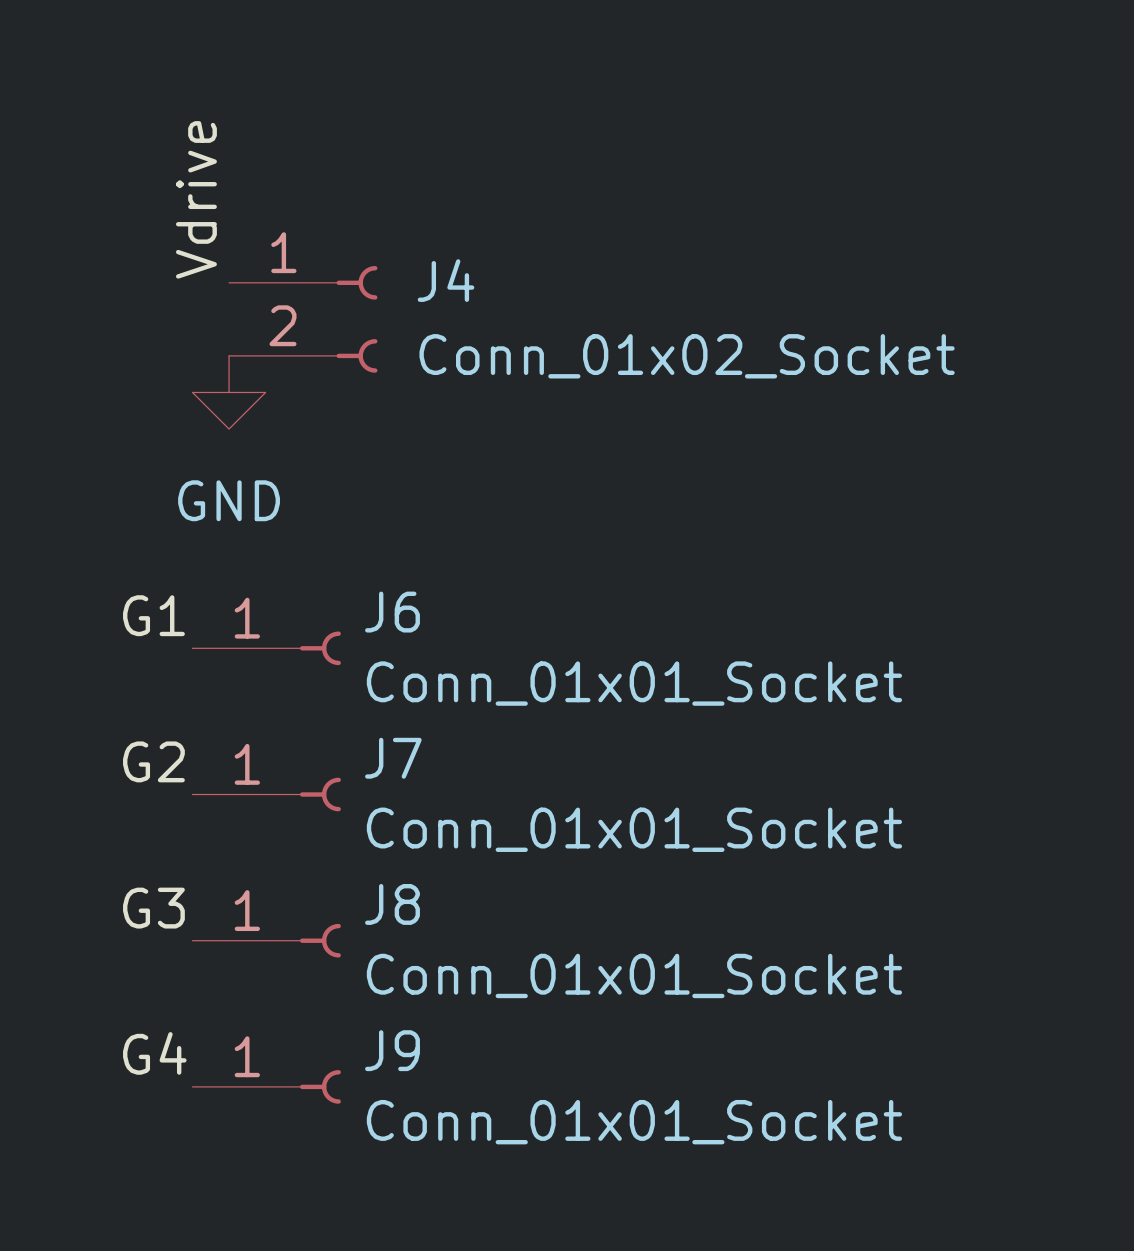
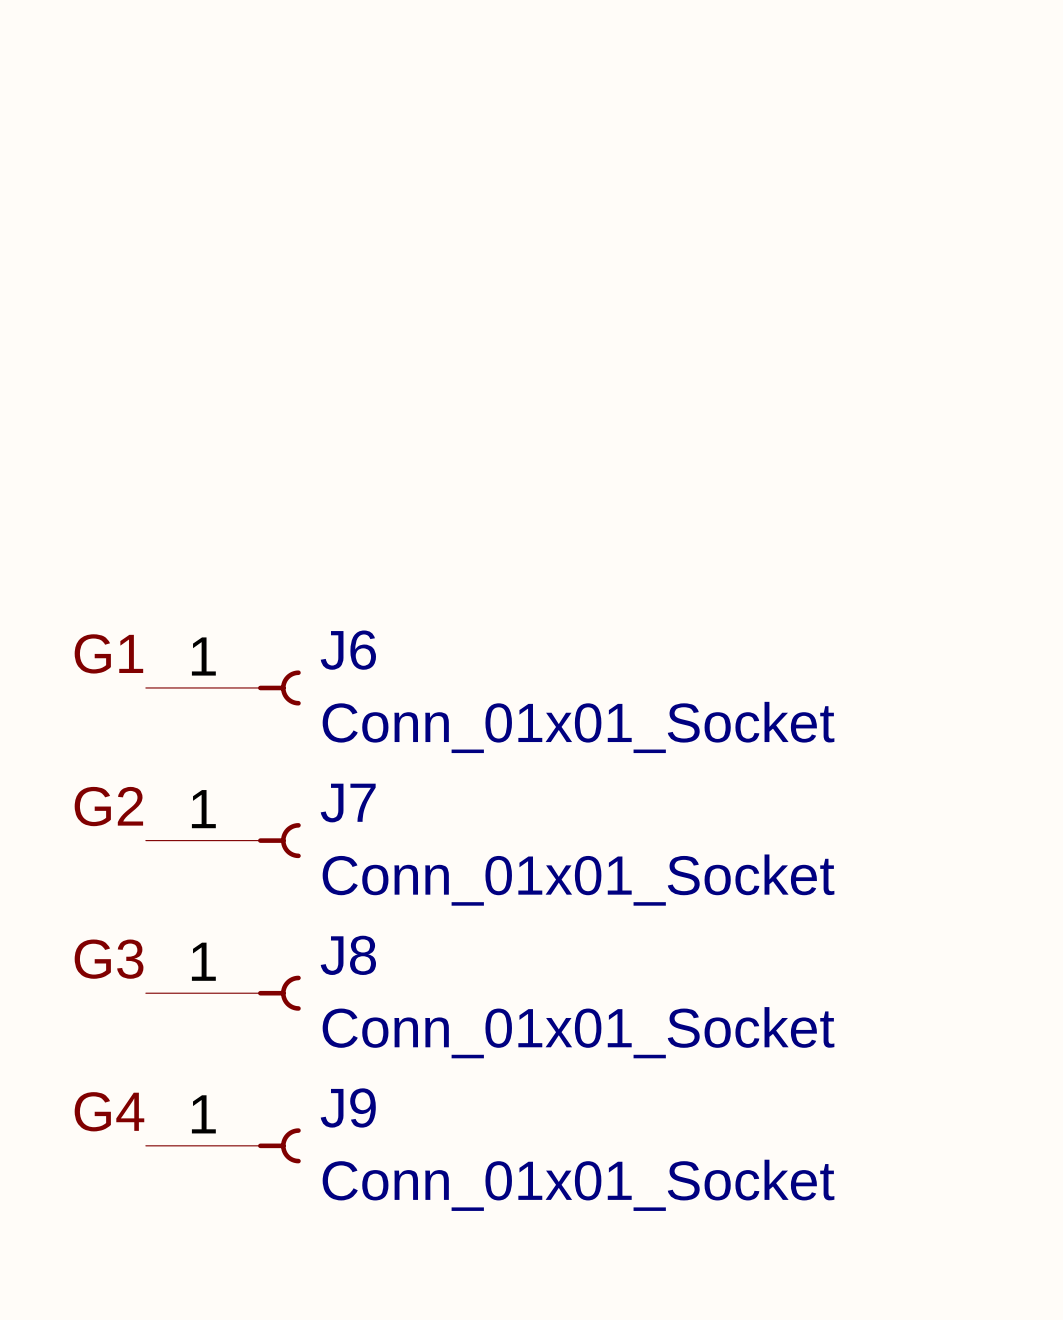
label: Vdrive (196, 199) -> none
J4: Conn_01x02_Socket (303, 319) -> none
power symbol: GND (229, 392) -> none

